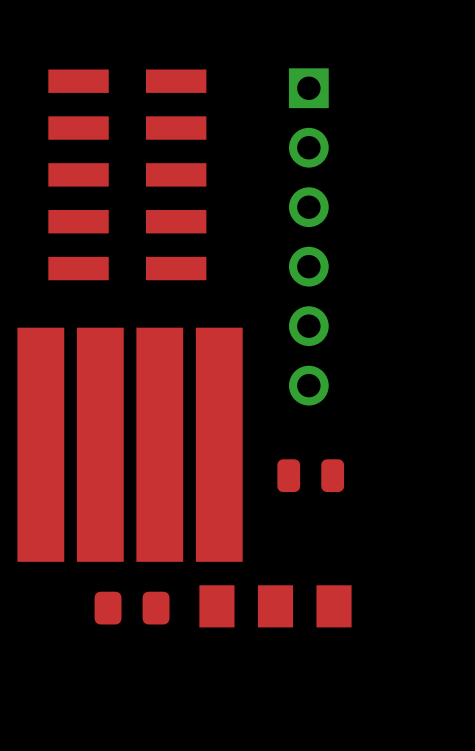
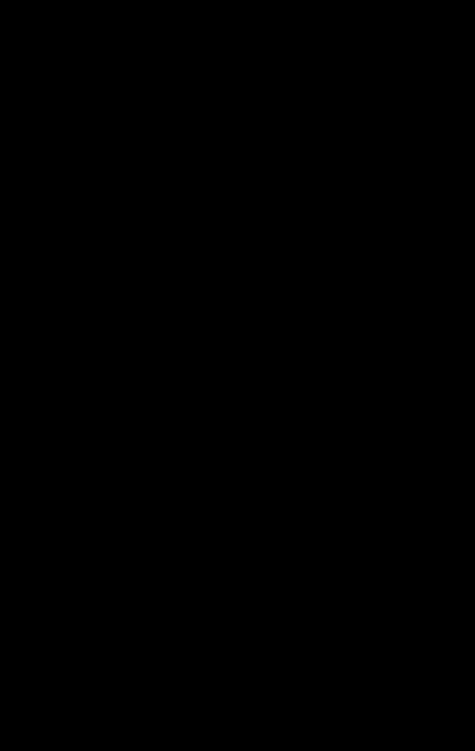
part: (127, 174) -> none
part: (308, 236) -> none
part: (130, 444) -> none
part: (310, 475) -> none
part: (275, 606) -> none
part: (132, 608) -> none

